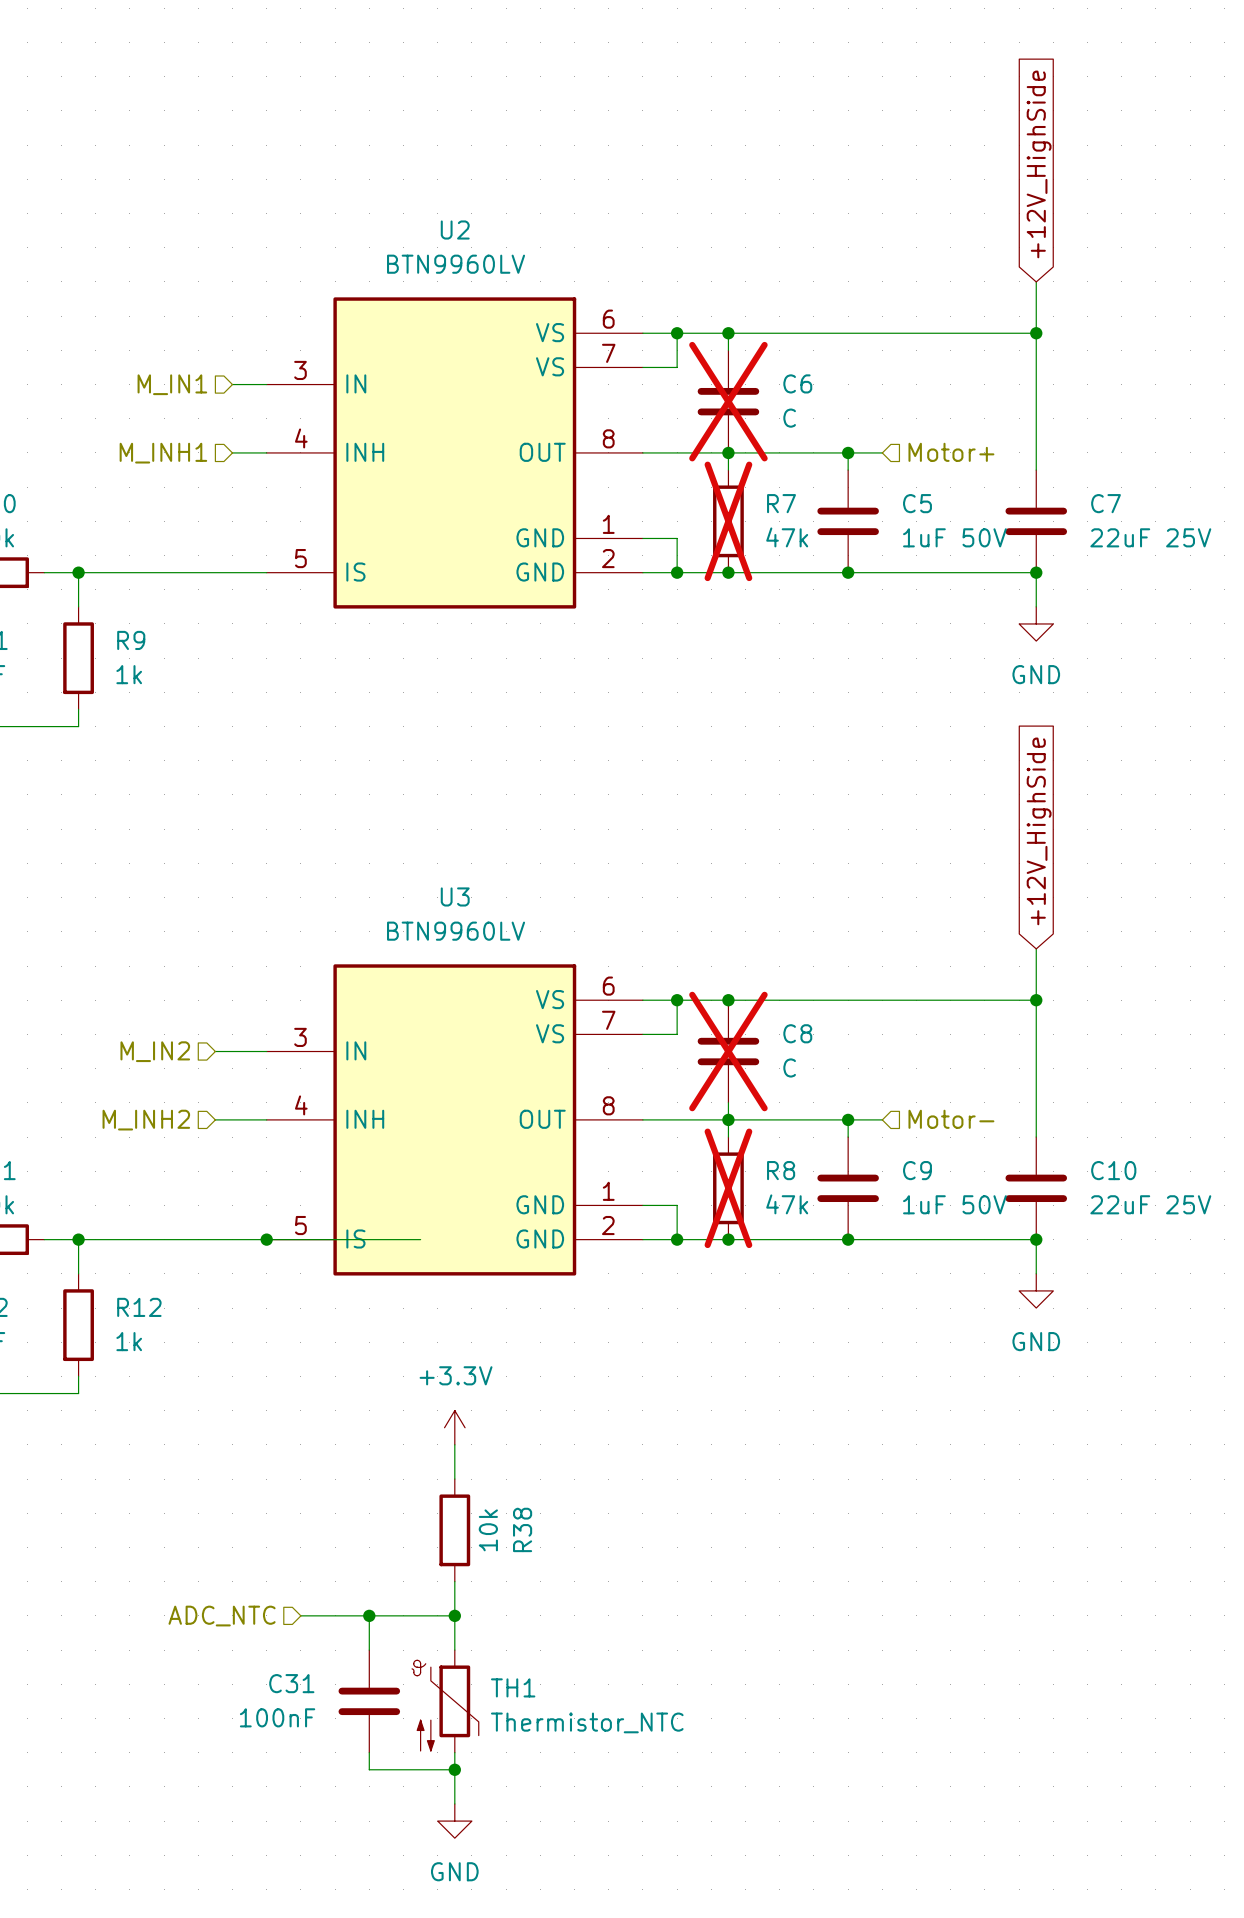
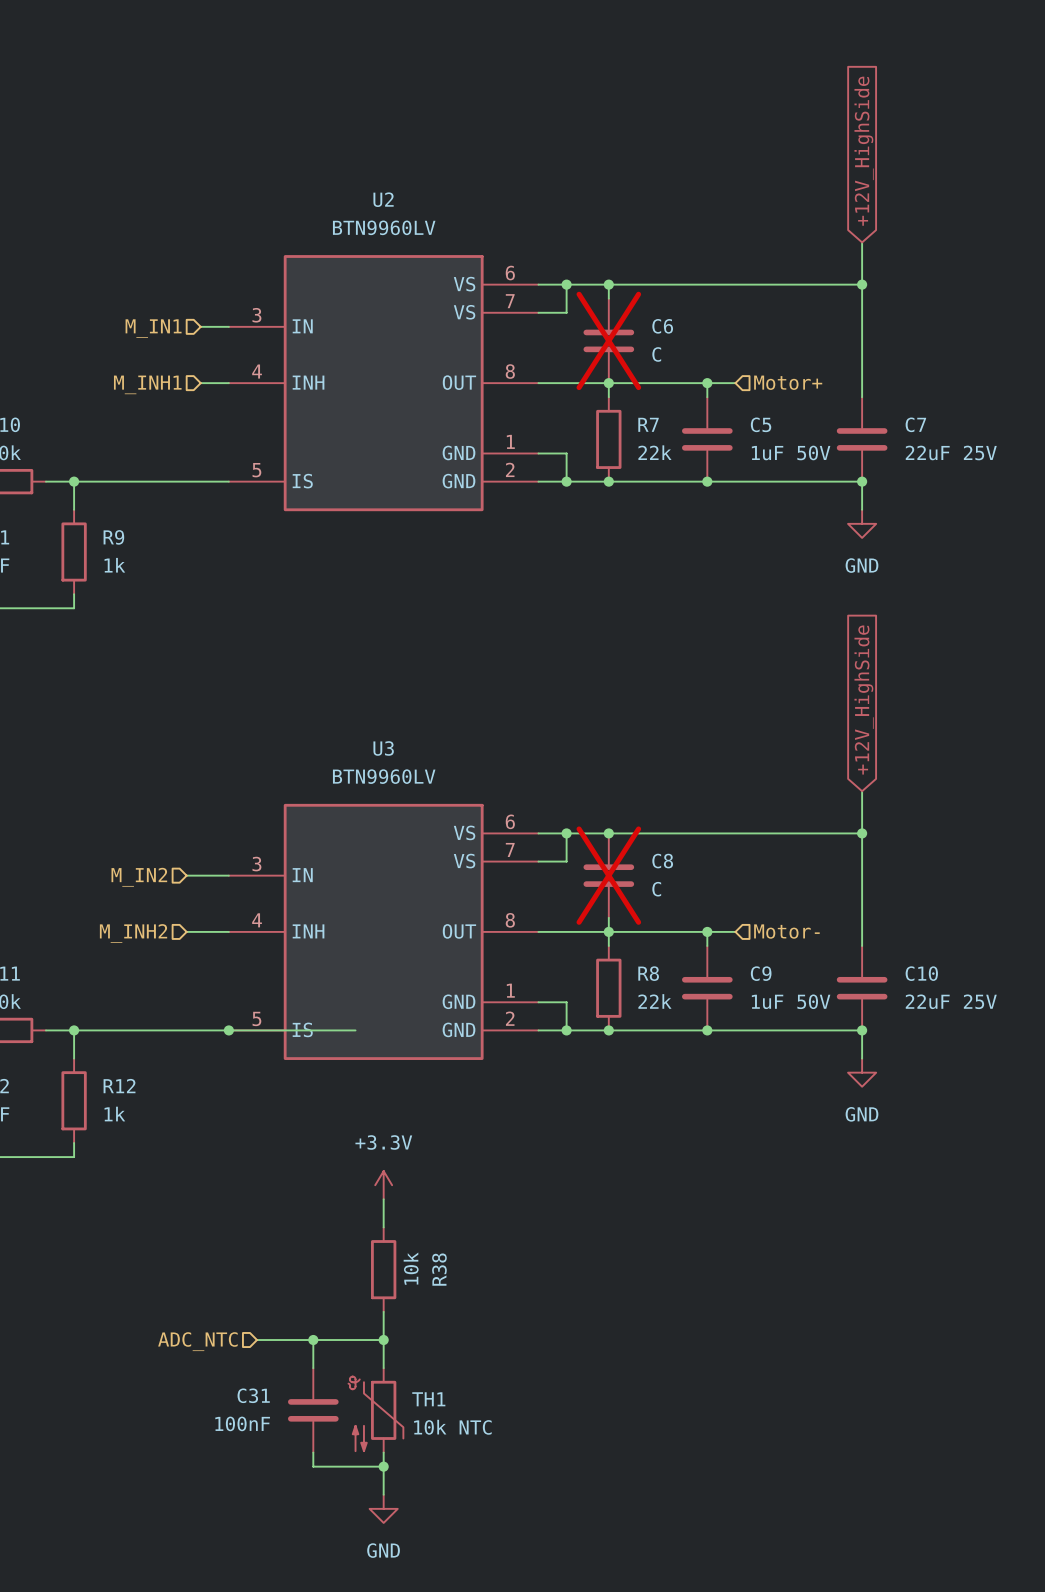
R7 do-not-place cross: (728, 521) -> none
R7 value: 47k (787, 537) -> 22k (654, 452)
R8 do-not-place cross: (728, 1188) -> none
R8 value: 47k (787, 1204) -> 22k (654, 1001)
TH1 value: Thermistor_NTC (587, 1722) -> 10k NTC (452, 1427)

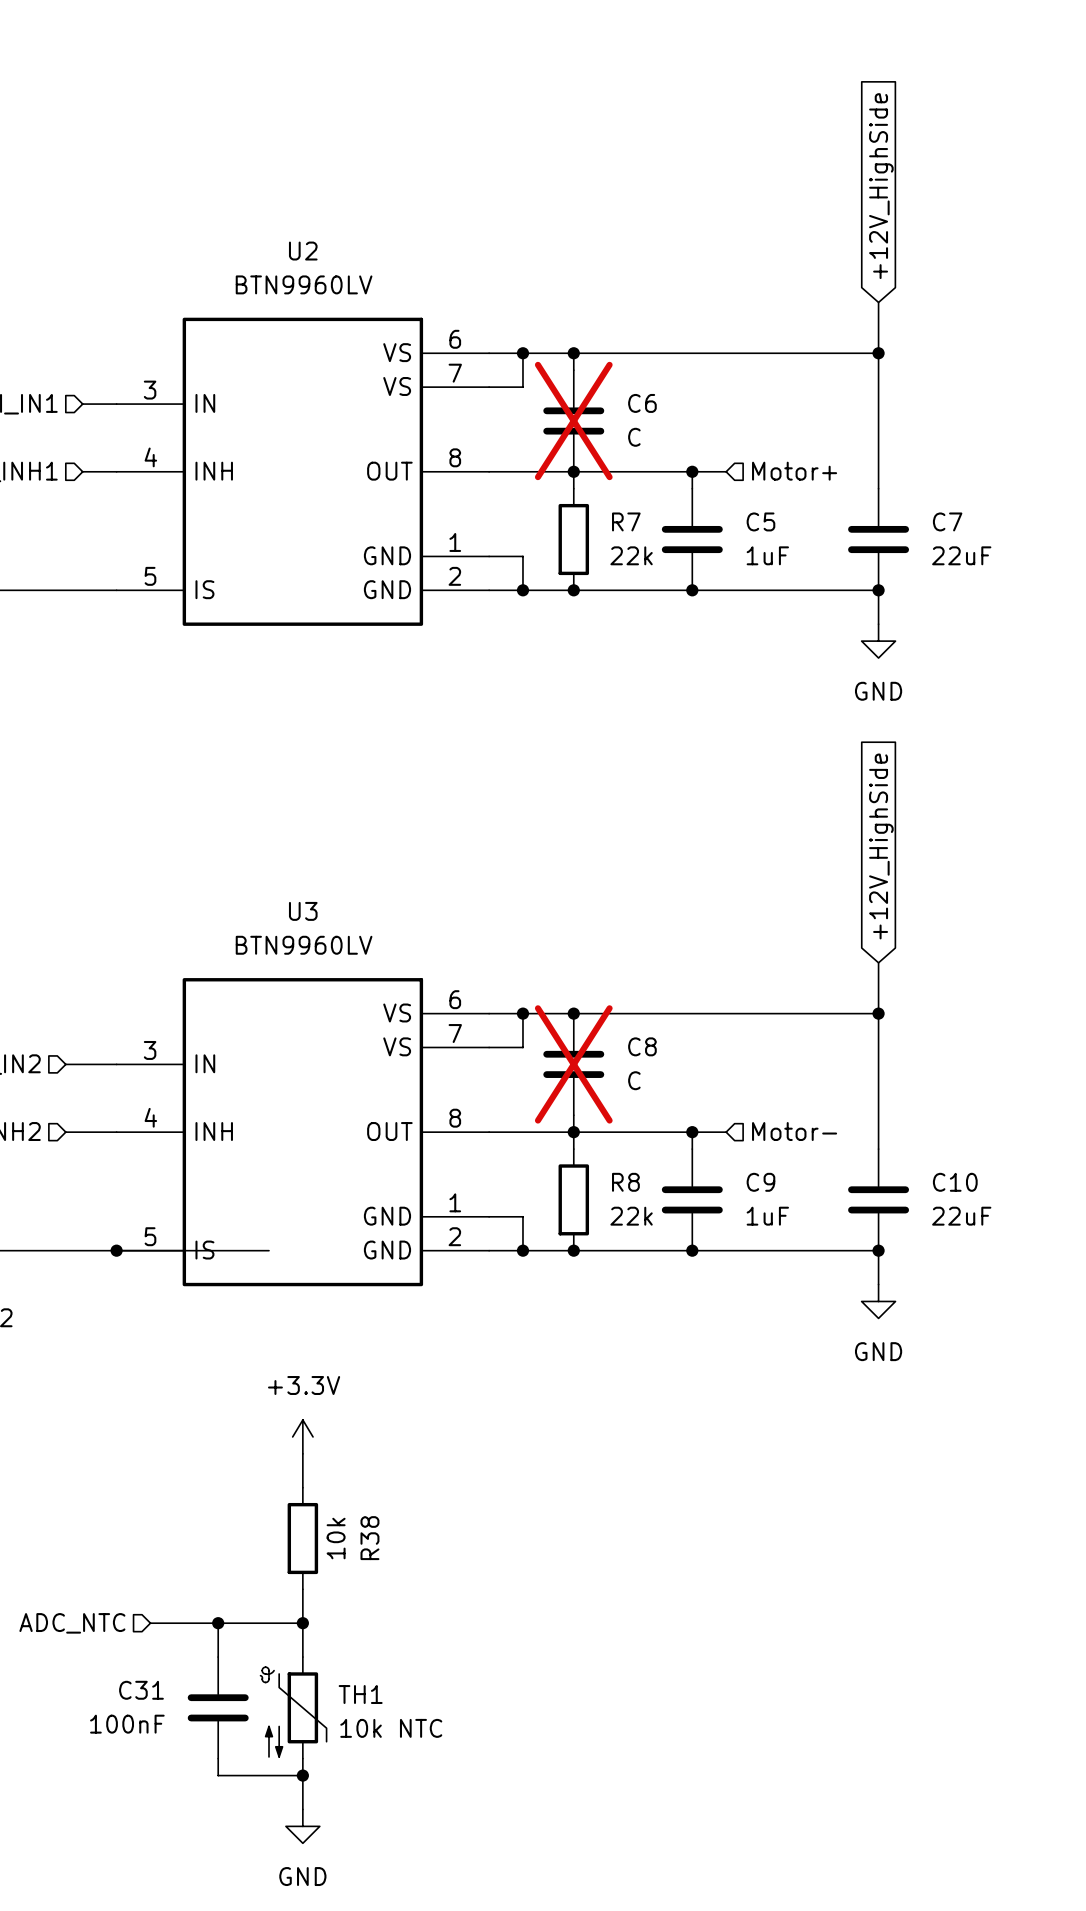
C5 value: 1uF 50V (791, 452) -> 1uF (767, 555)
C7 value: 22uF 25V (951, 452) -> 22uF (961, 555)
C9 value: 1uF 50V (791, 1001) -> 1uF (767, 1216)
C10 value: 22uF 25V (951, 1001) -> 22uF (961, 1216)

